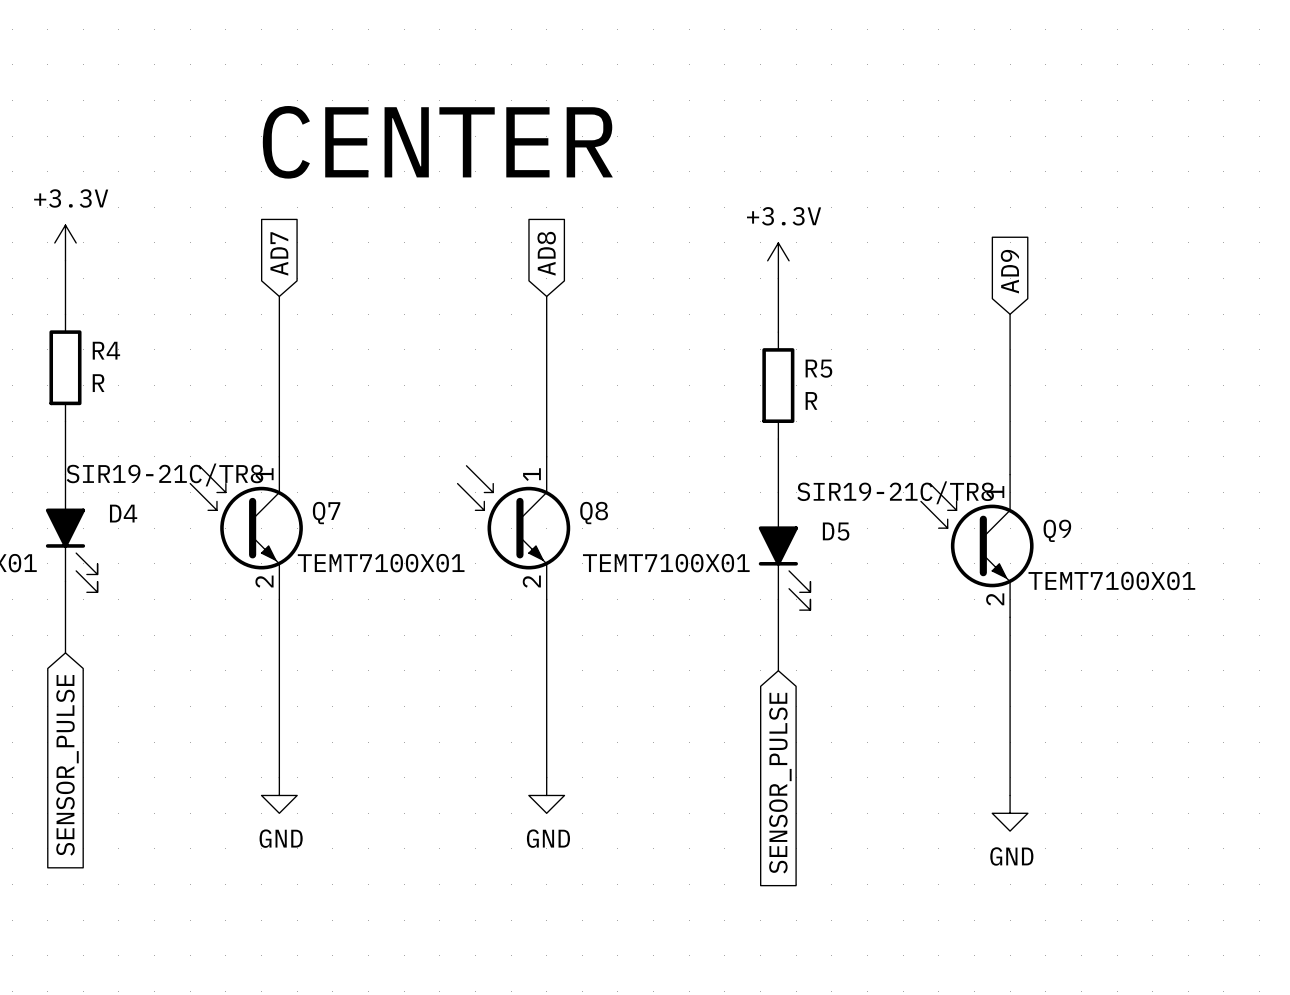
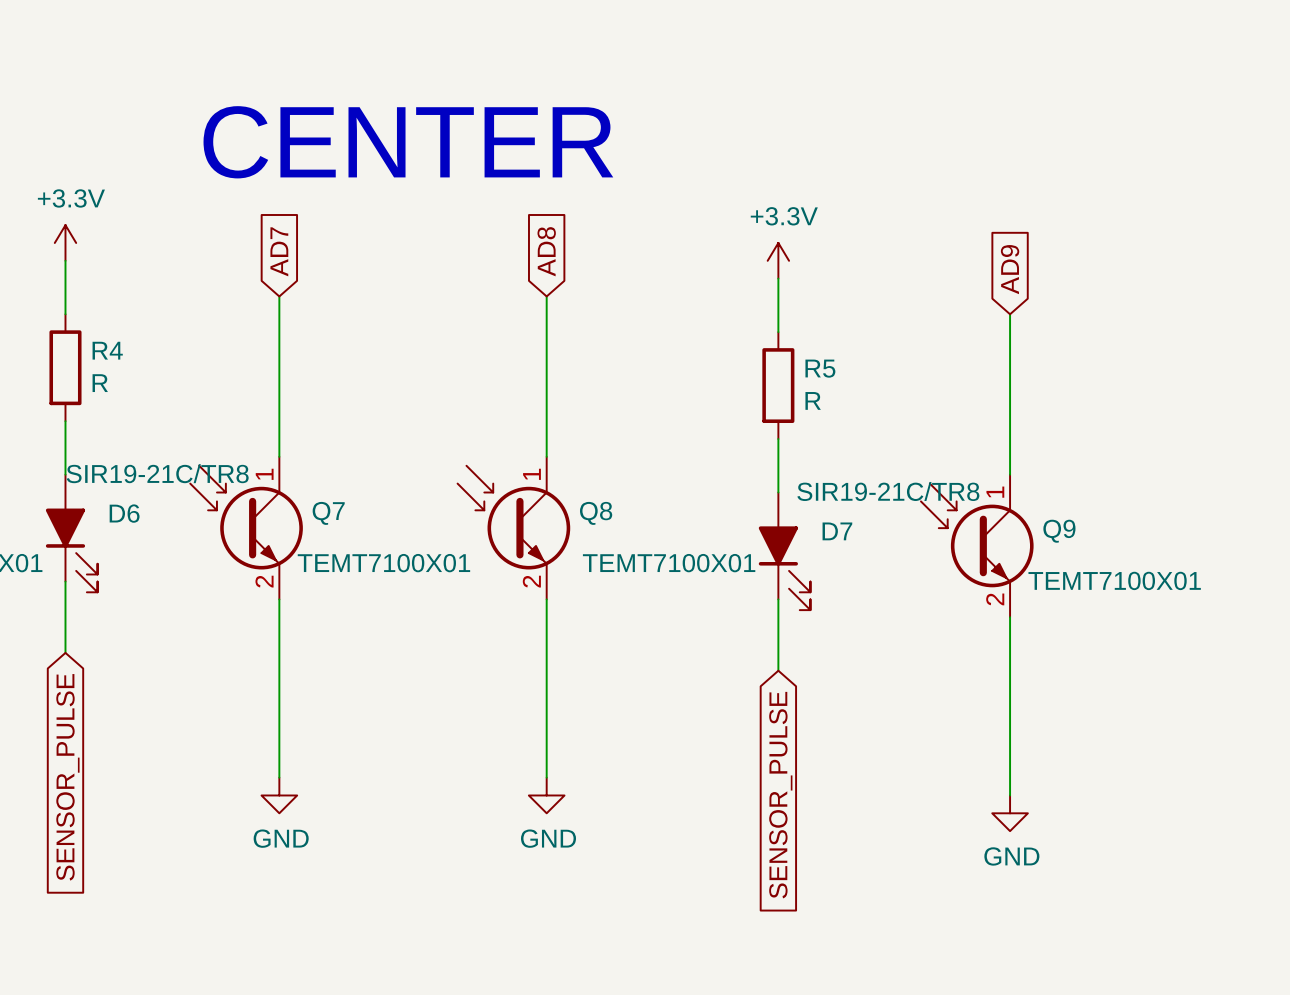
D4 name: D4 (123, 513) -> D6 (124, 513)
D5 name: D5 (836, 531) -> D7 (837, 531)

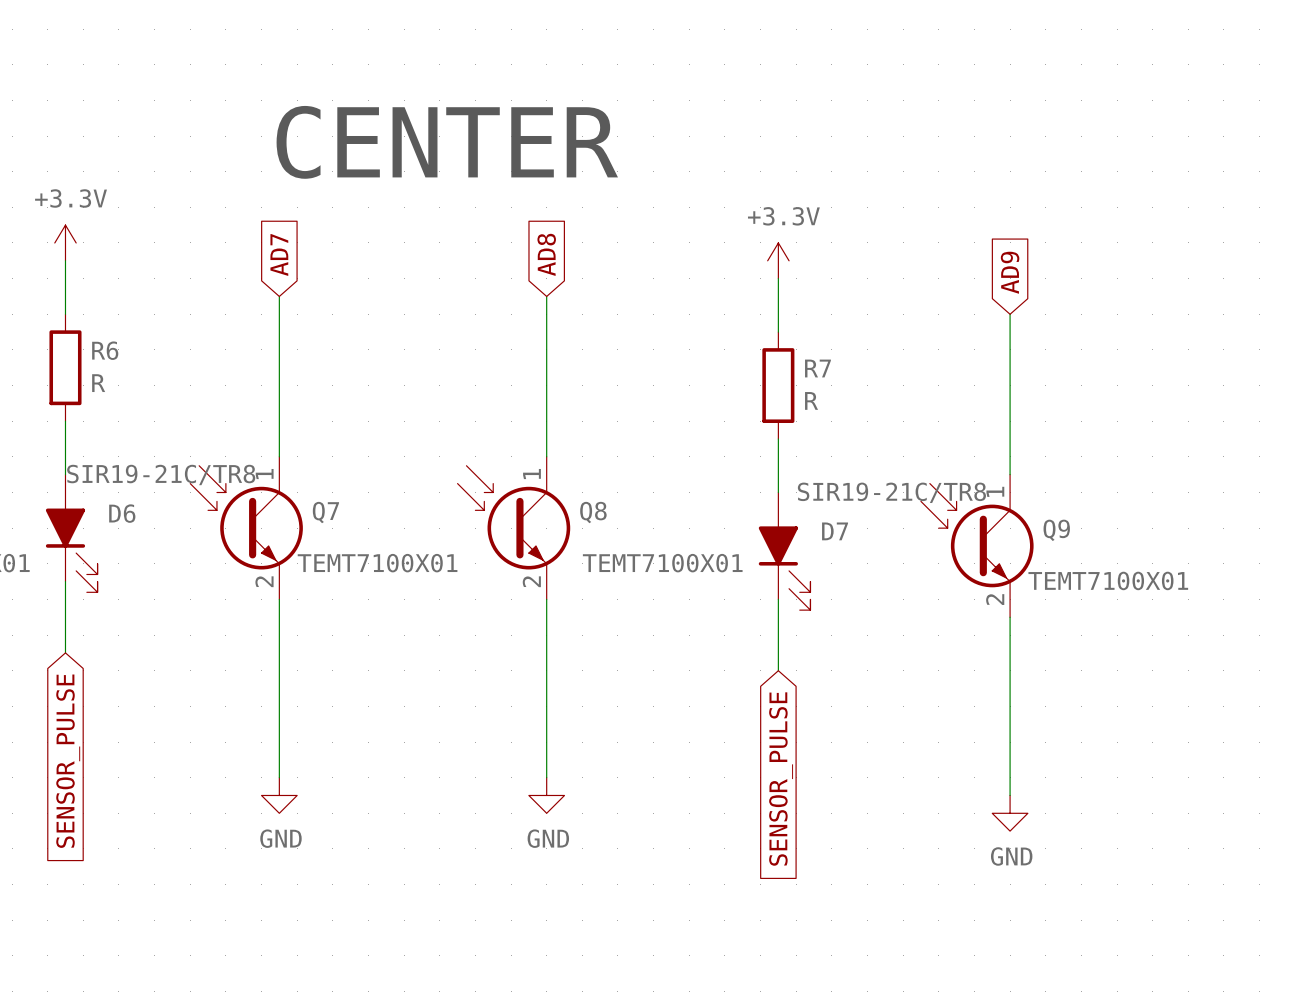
R4 name: R4 (107, 350) -> R6 (105, 350)
R5 name: R5 (820, 368) -> R7 (817, 368)

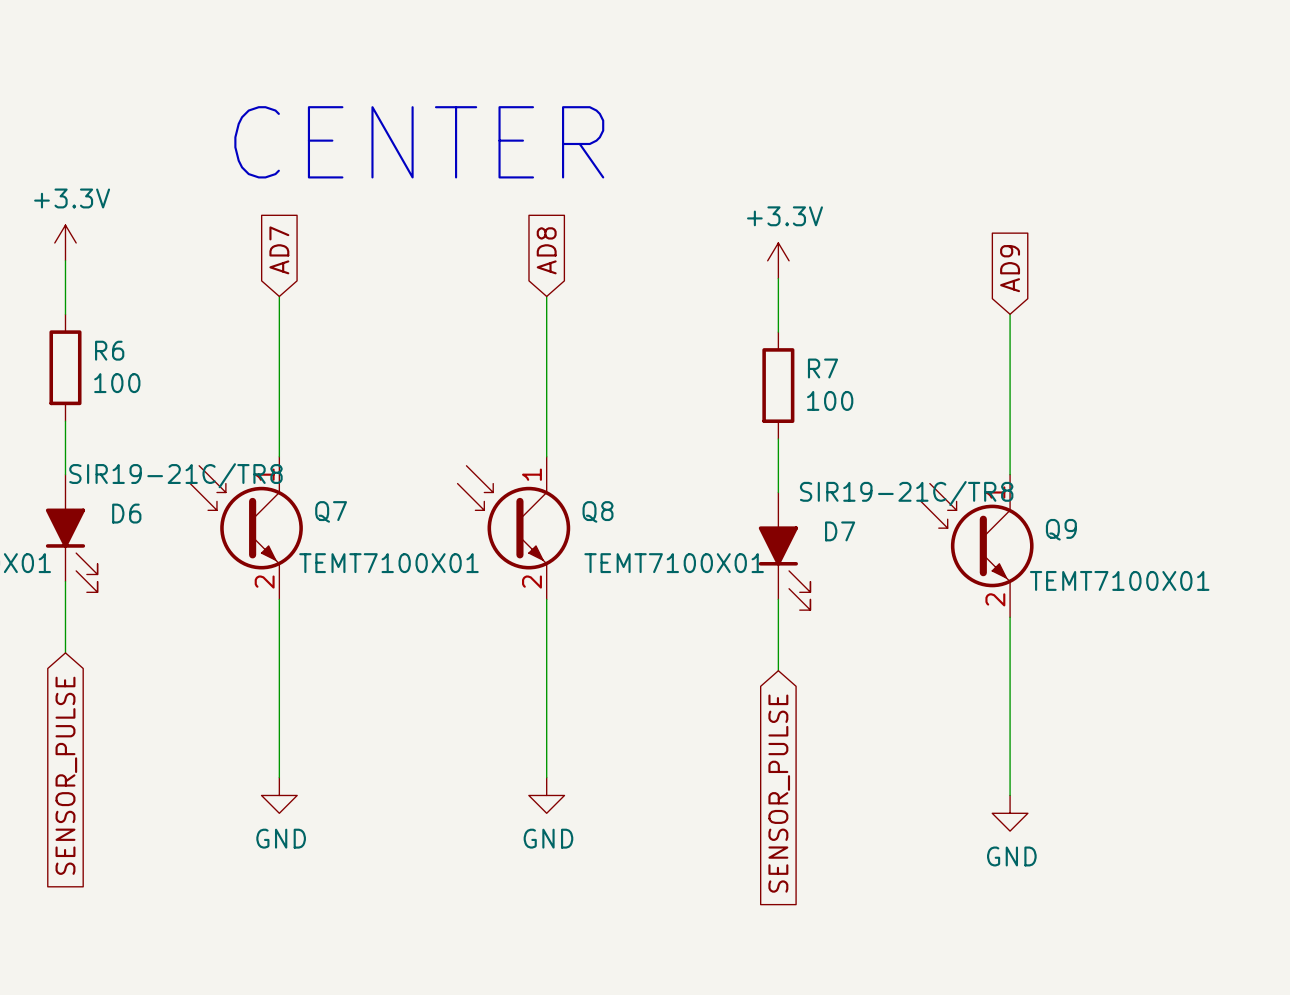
R6 value: R (98, 383) -> 100 (117, 383)
R7 value: R (811, 400) -> 100 (830, 400)

